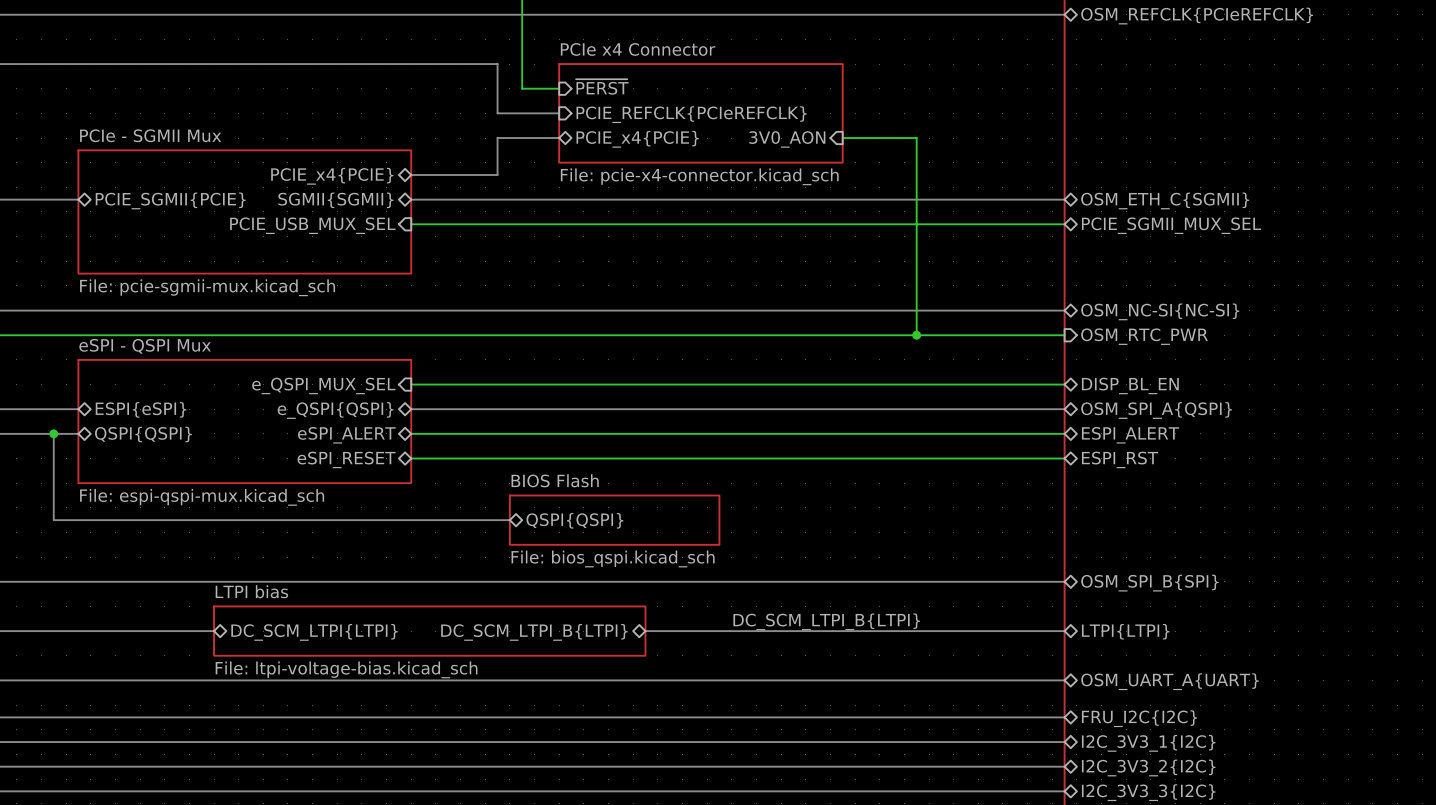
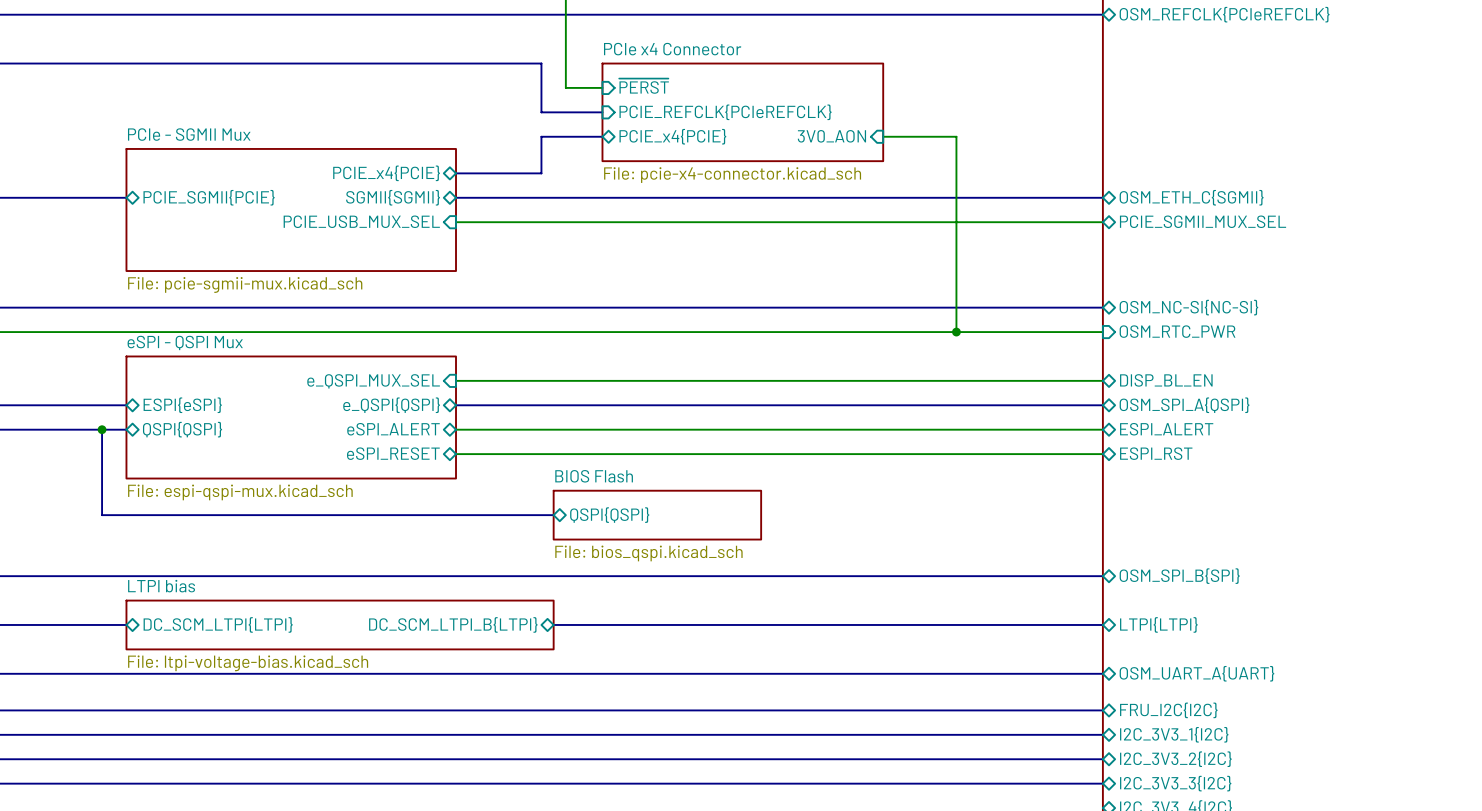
label: DC_SCM_LTPI_B{LTPI} (826, 621) -> none
bus: (78, 631) (214, 631) -> none
sheet LTPI bias position: (429, 631) -> (340, 624)
bus: none -> (553, 624) (687, 624)
sheet pin position: DC_SCM_LTPI{LTPI} (314, 632) -> DC_SCM_LTPI{LTPI} (218, 624)
sheet pin position: DC_SCM_LTPI_B{LTPI} (534, 632) -> DC_SCM_LTPI_B{LTPI} (453, 624)

